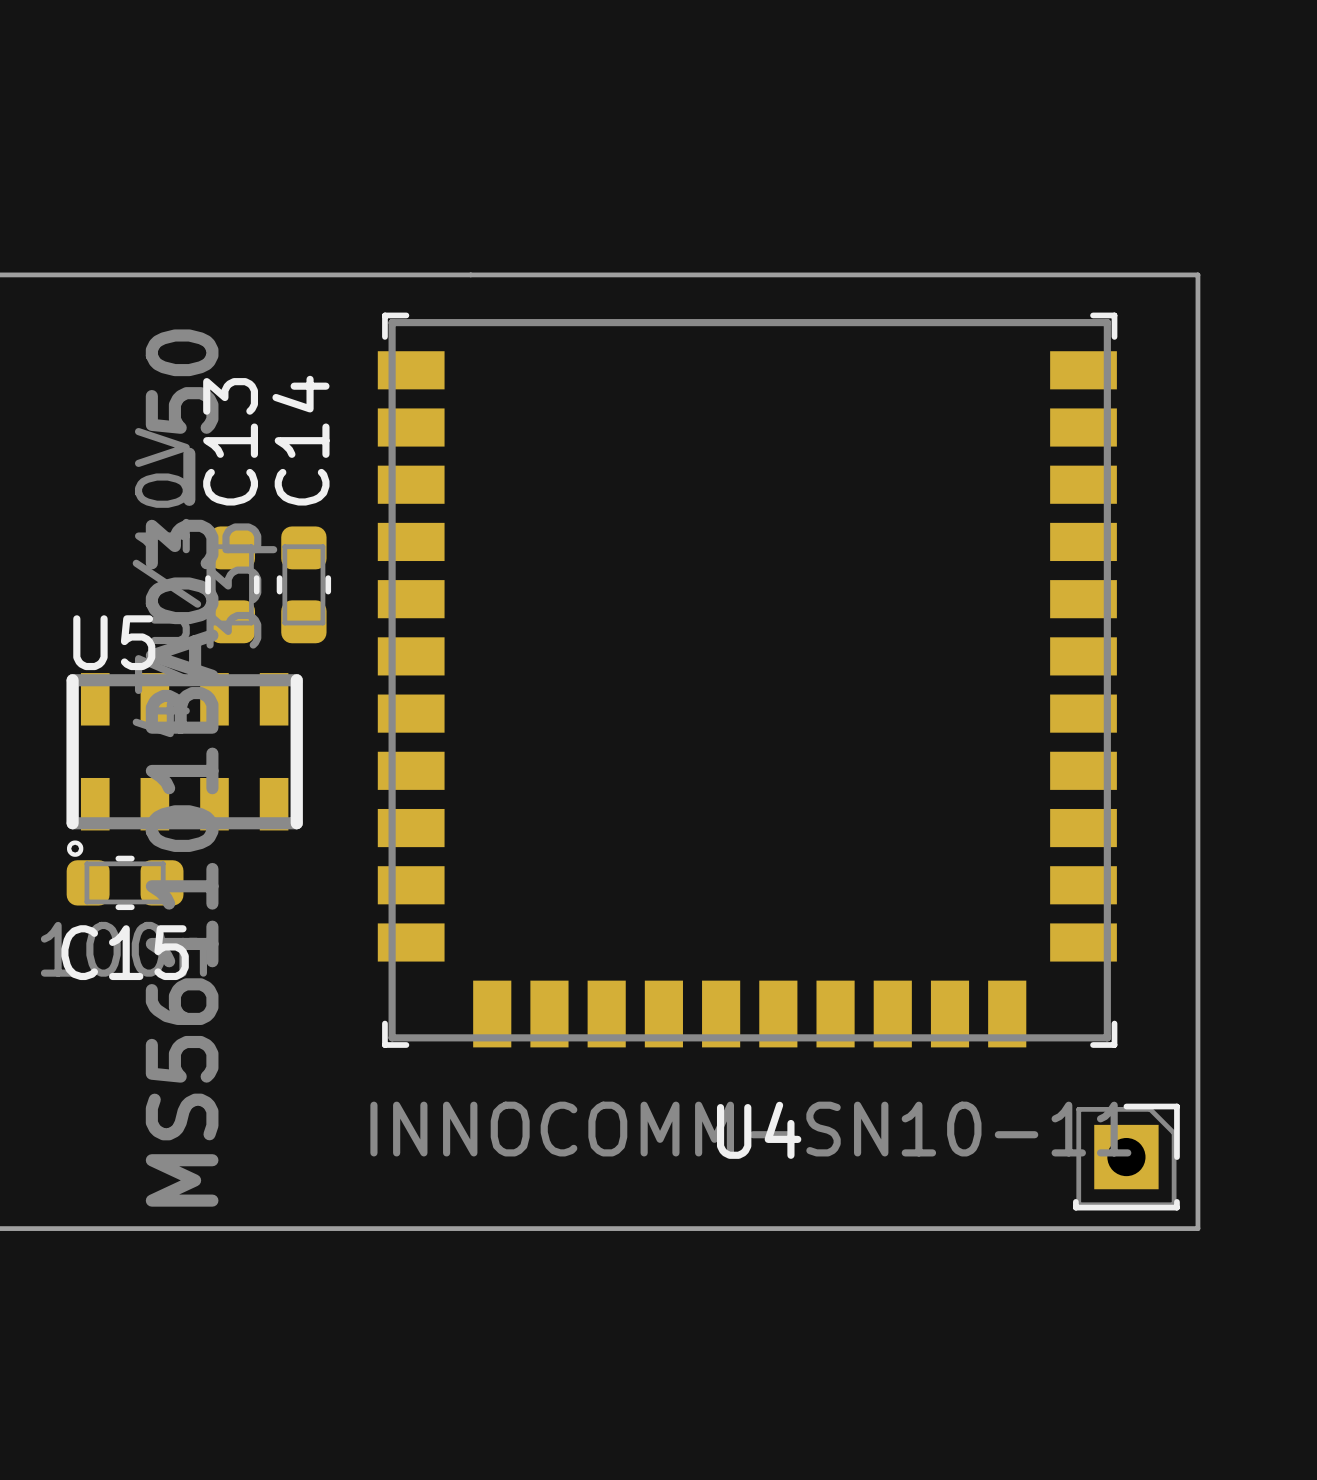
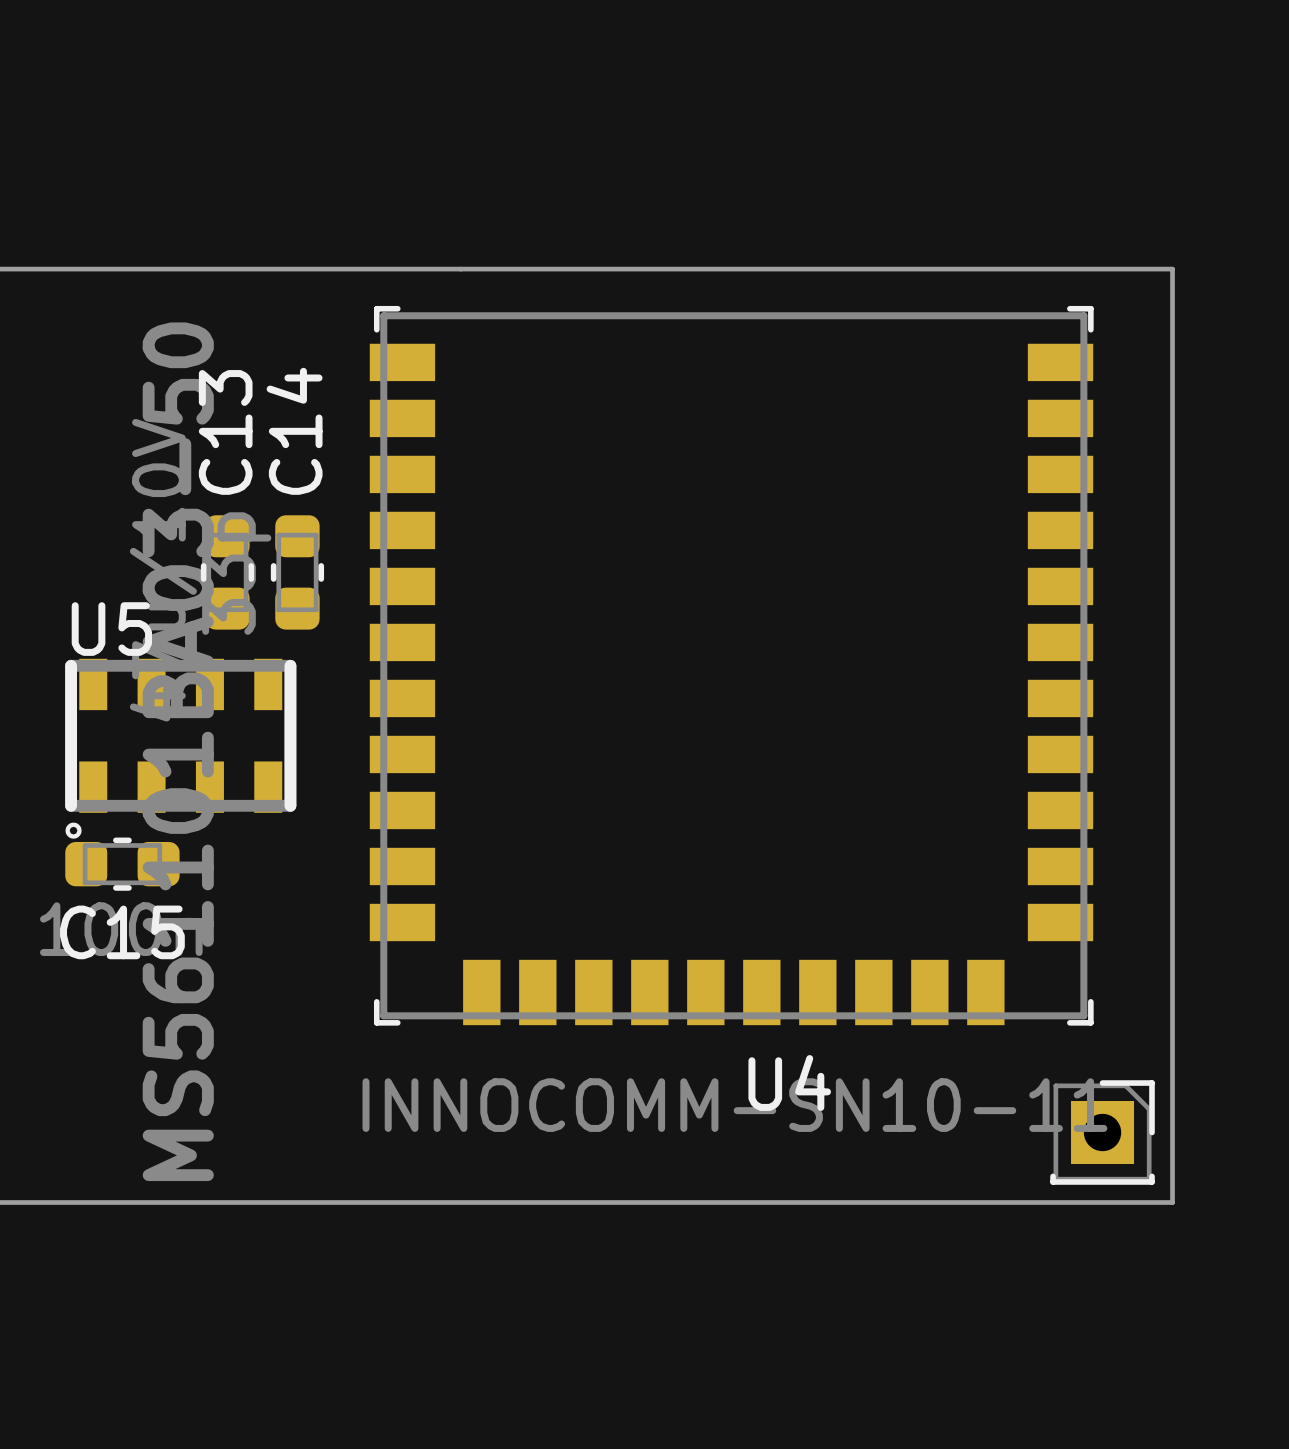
U4 name position: U4 (759, 1130) -> U4 (789, 1082)

